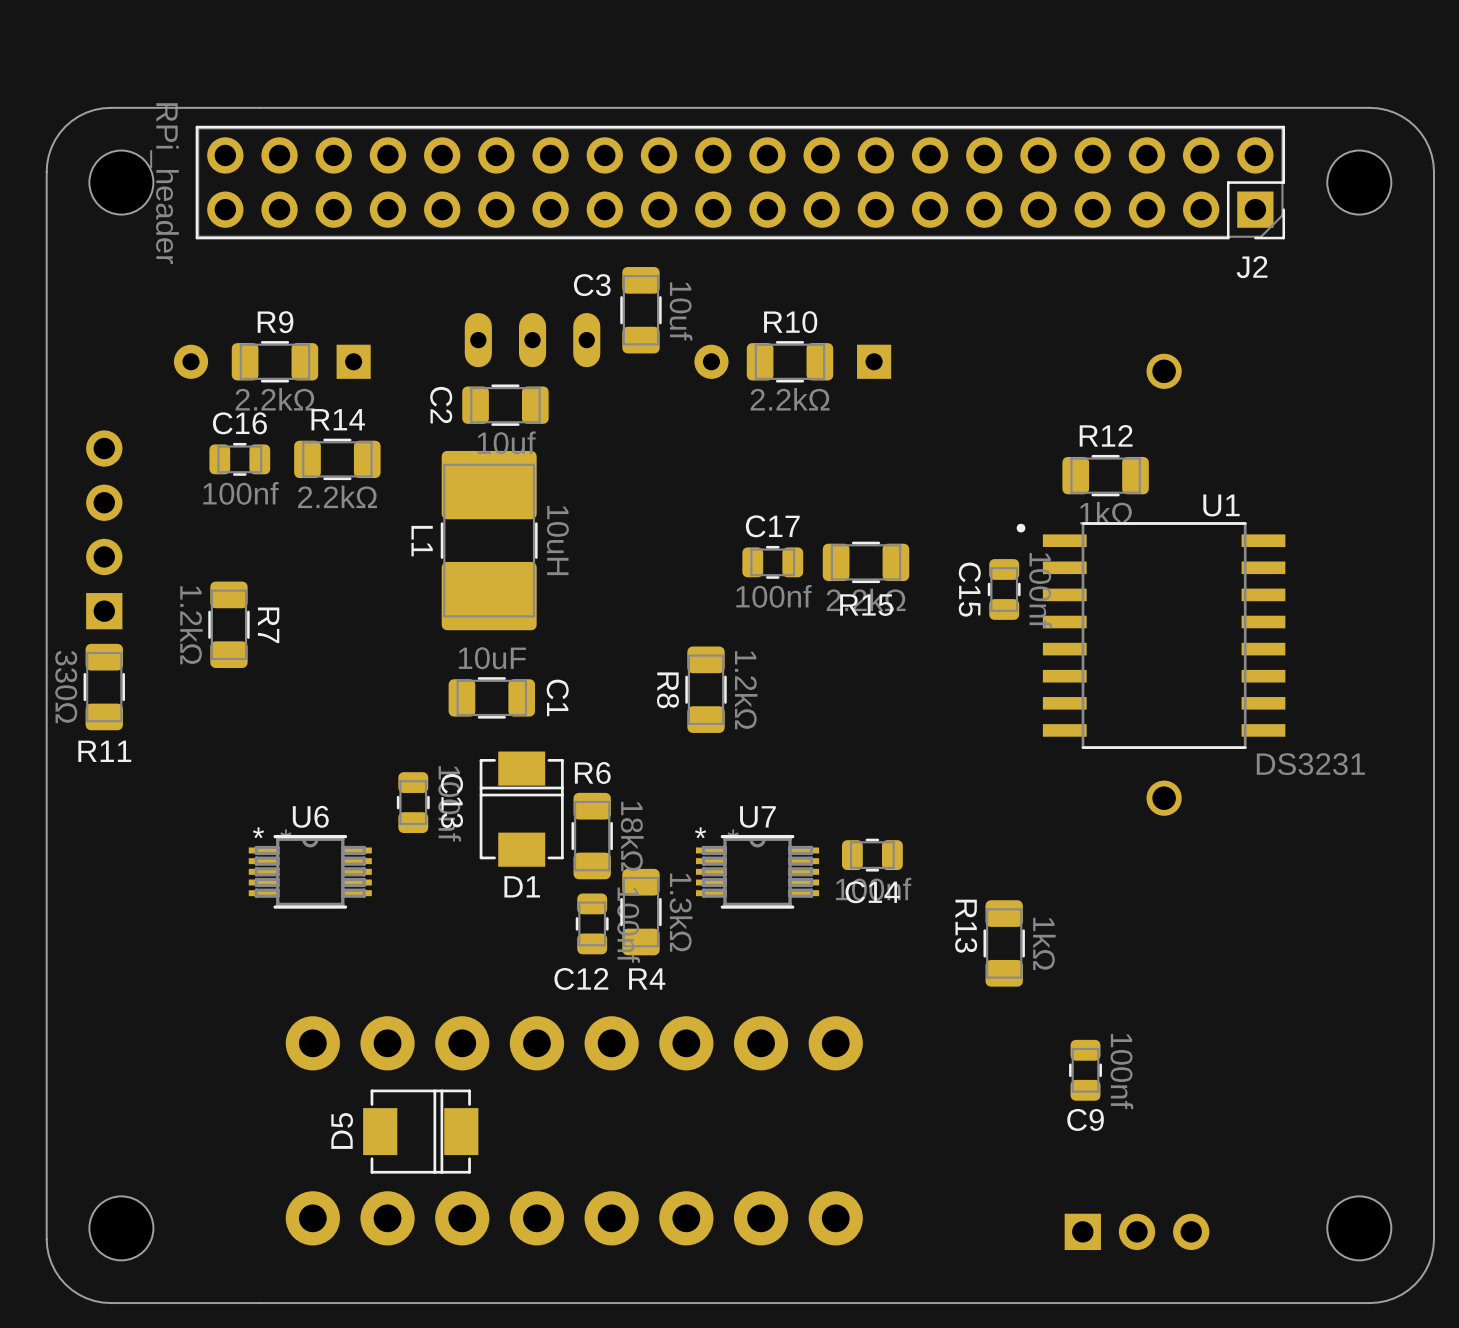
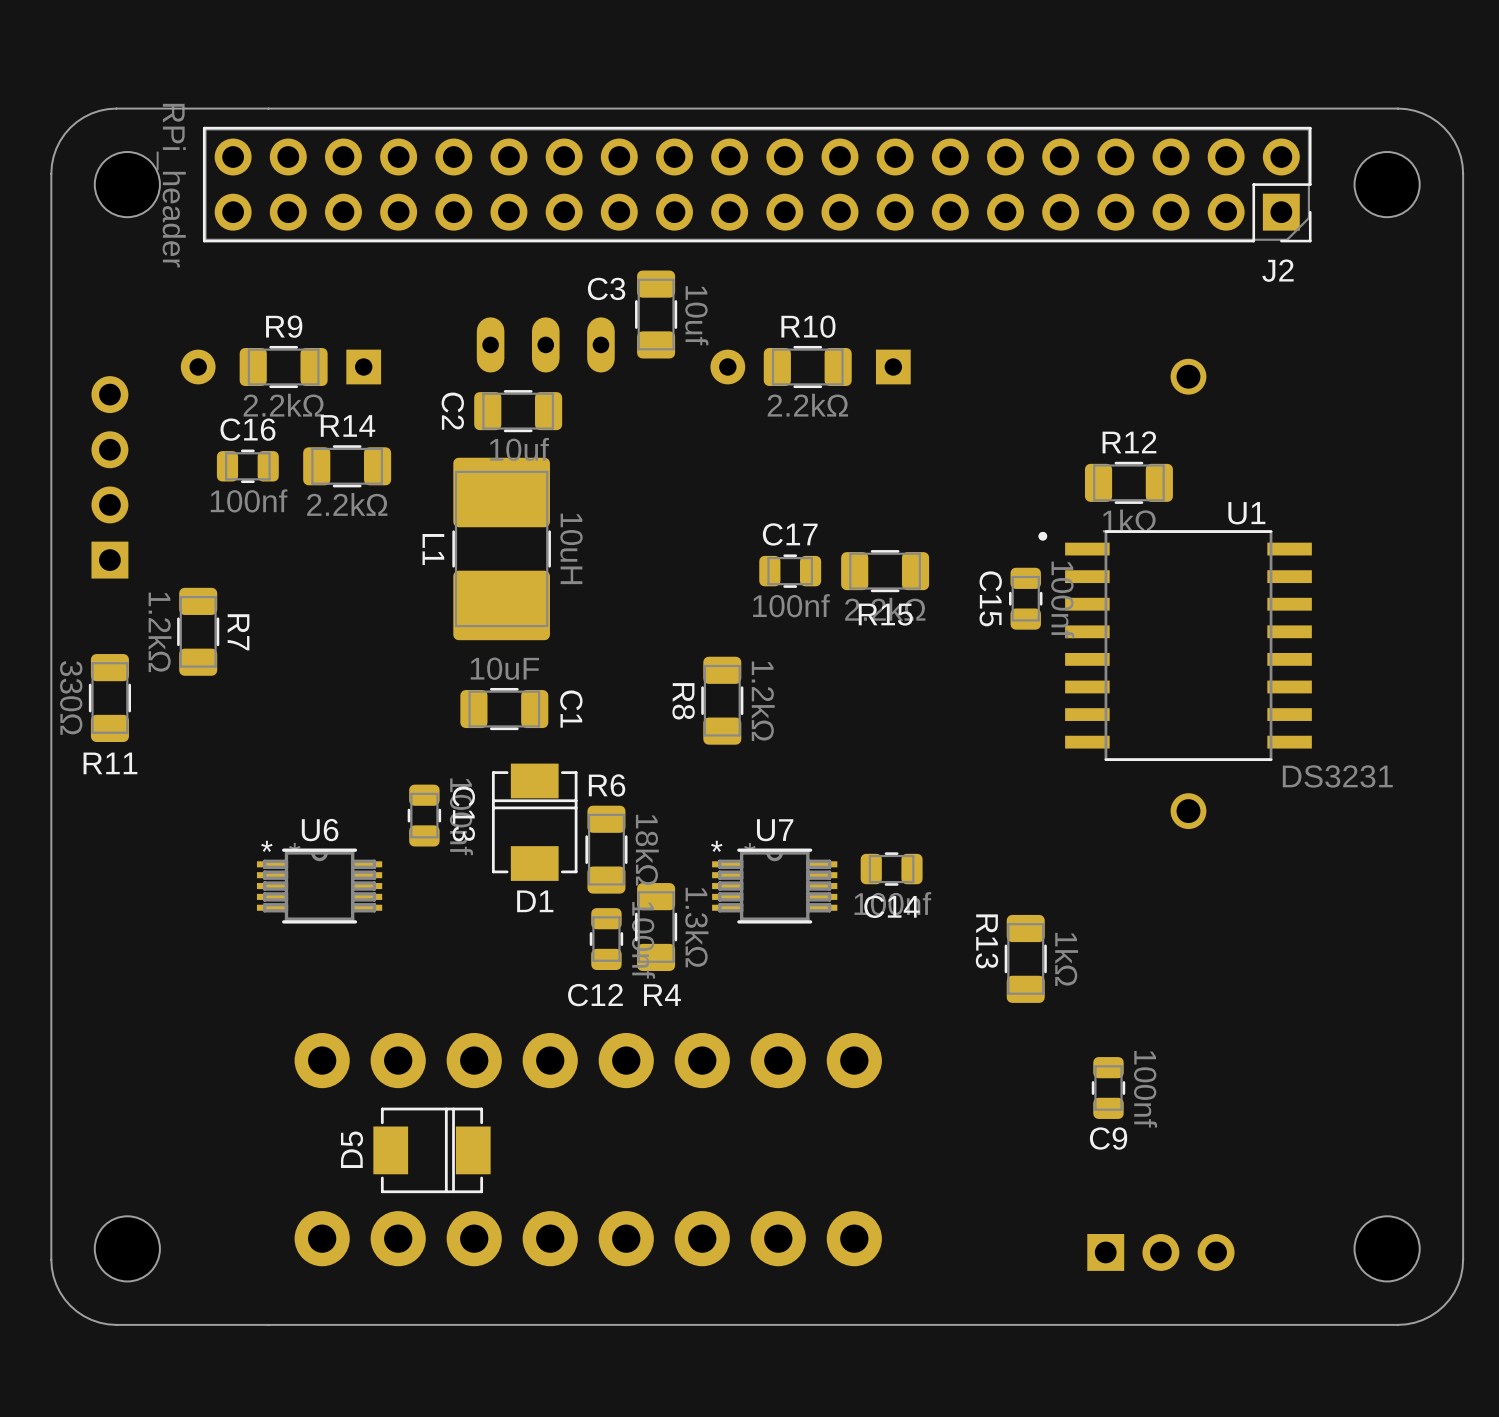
part position: (104, 529) -> (109, 477)
R7 position: (228, 624) -> (198, 631)

